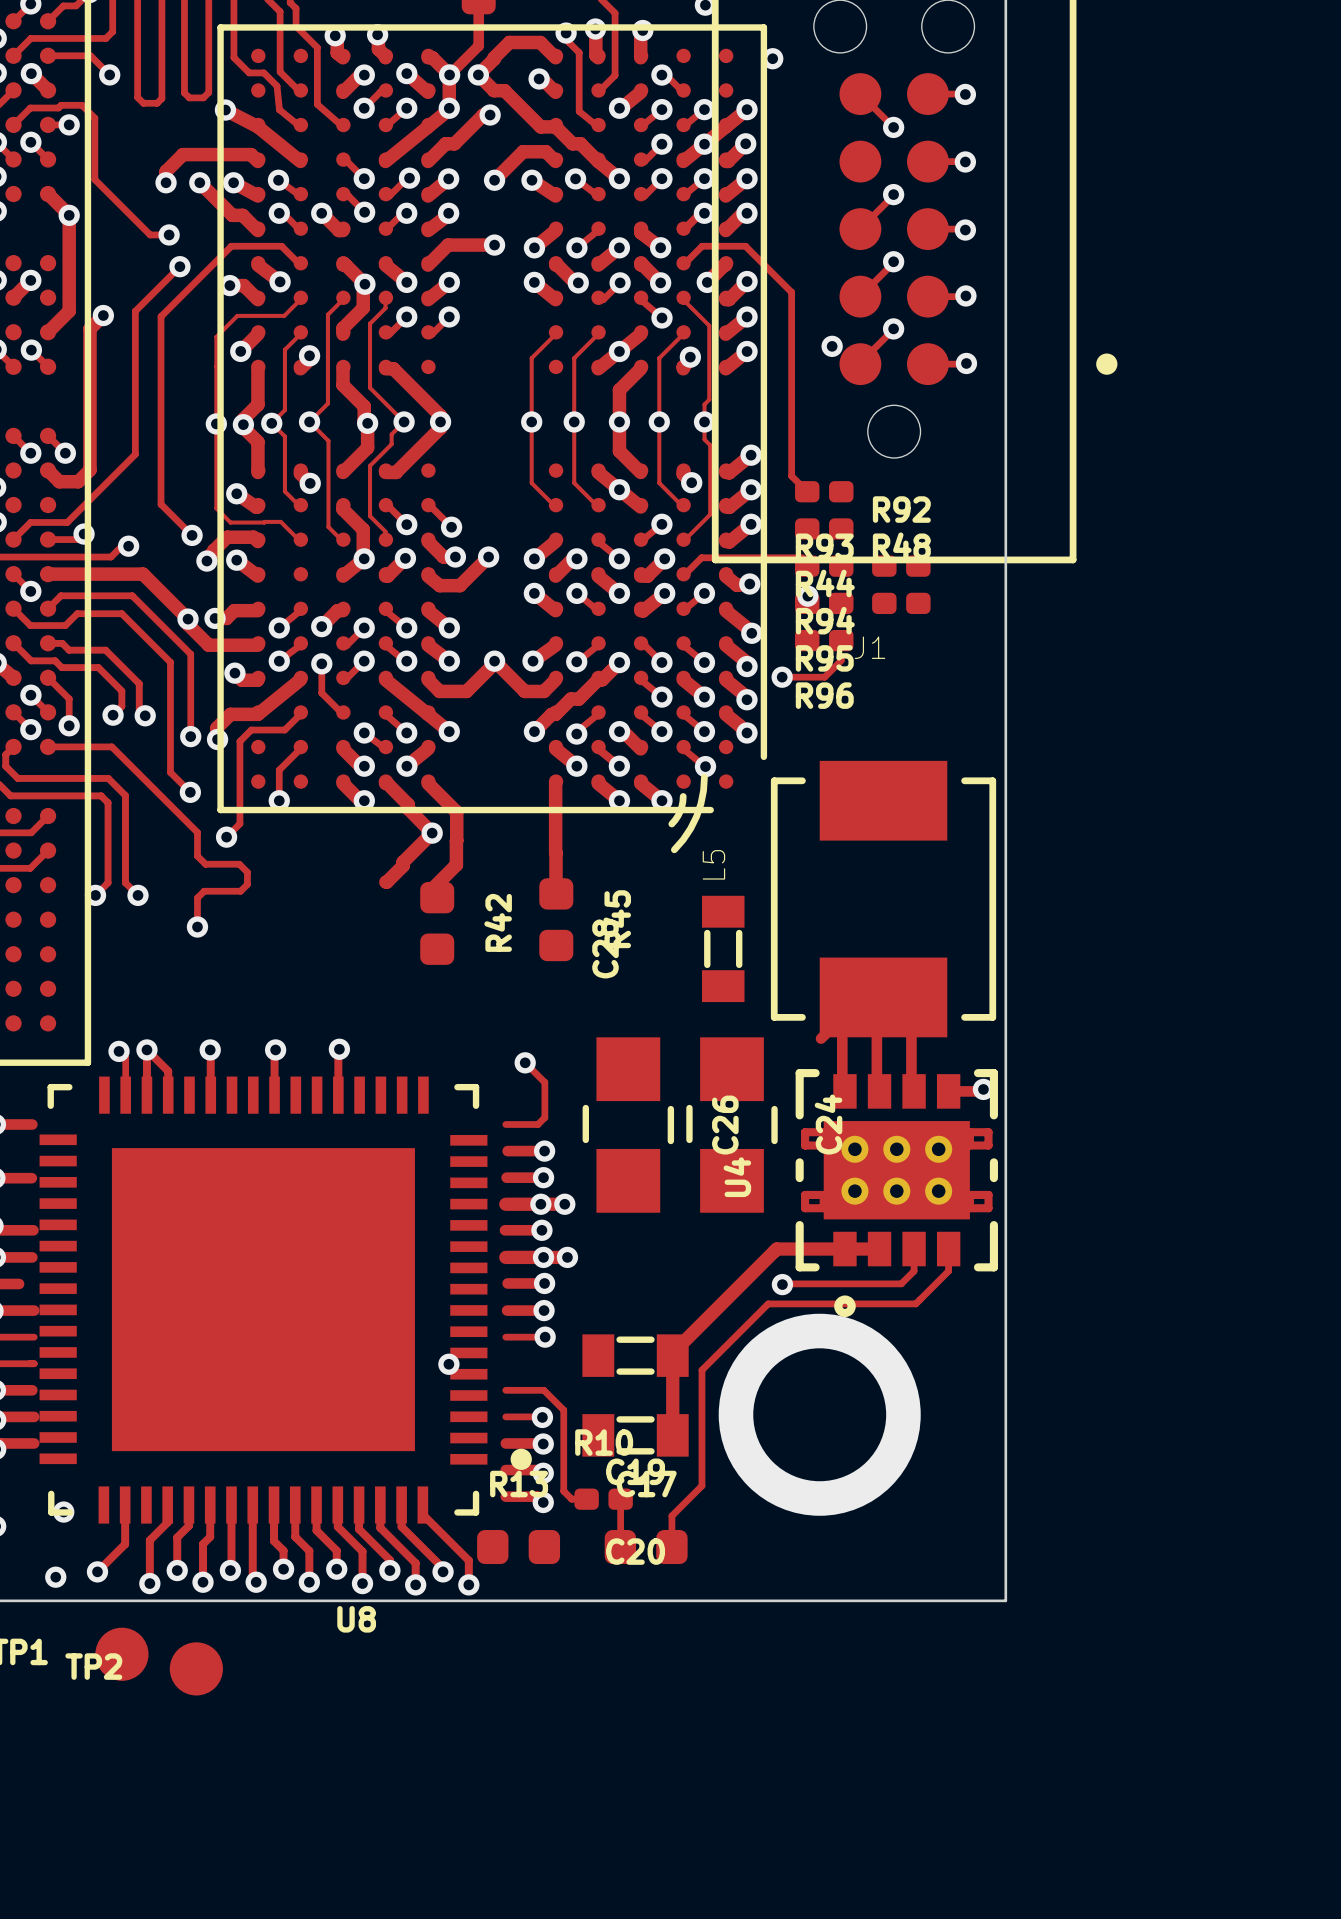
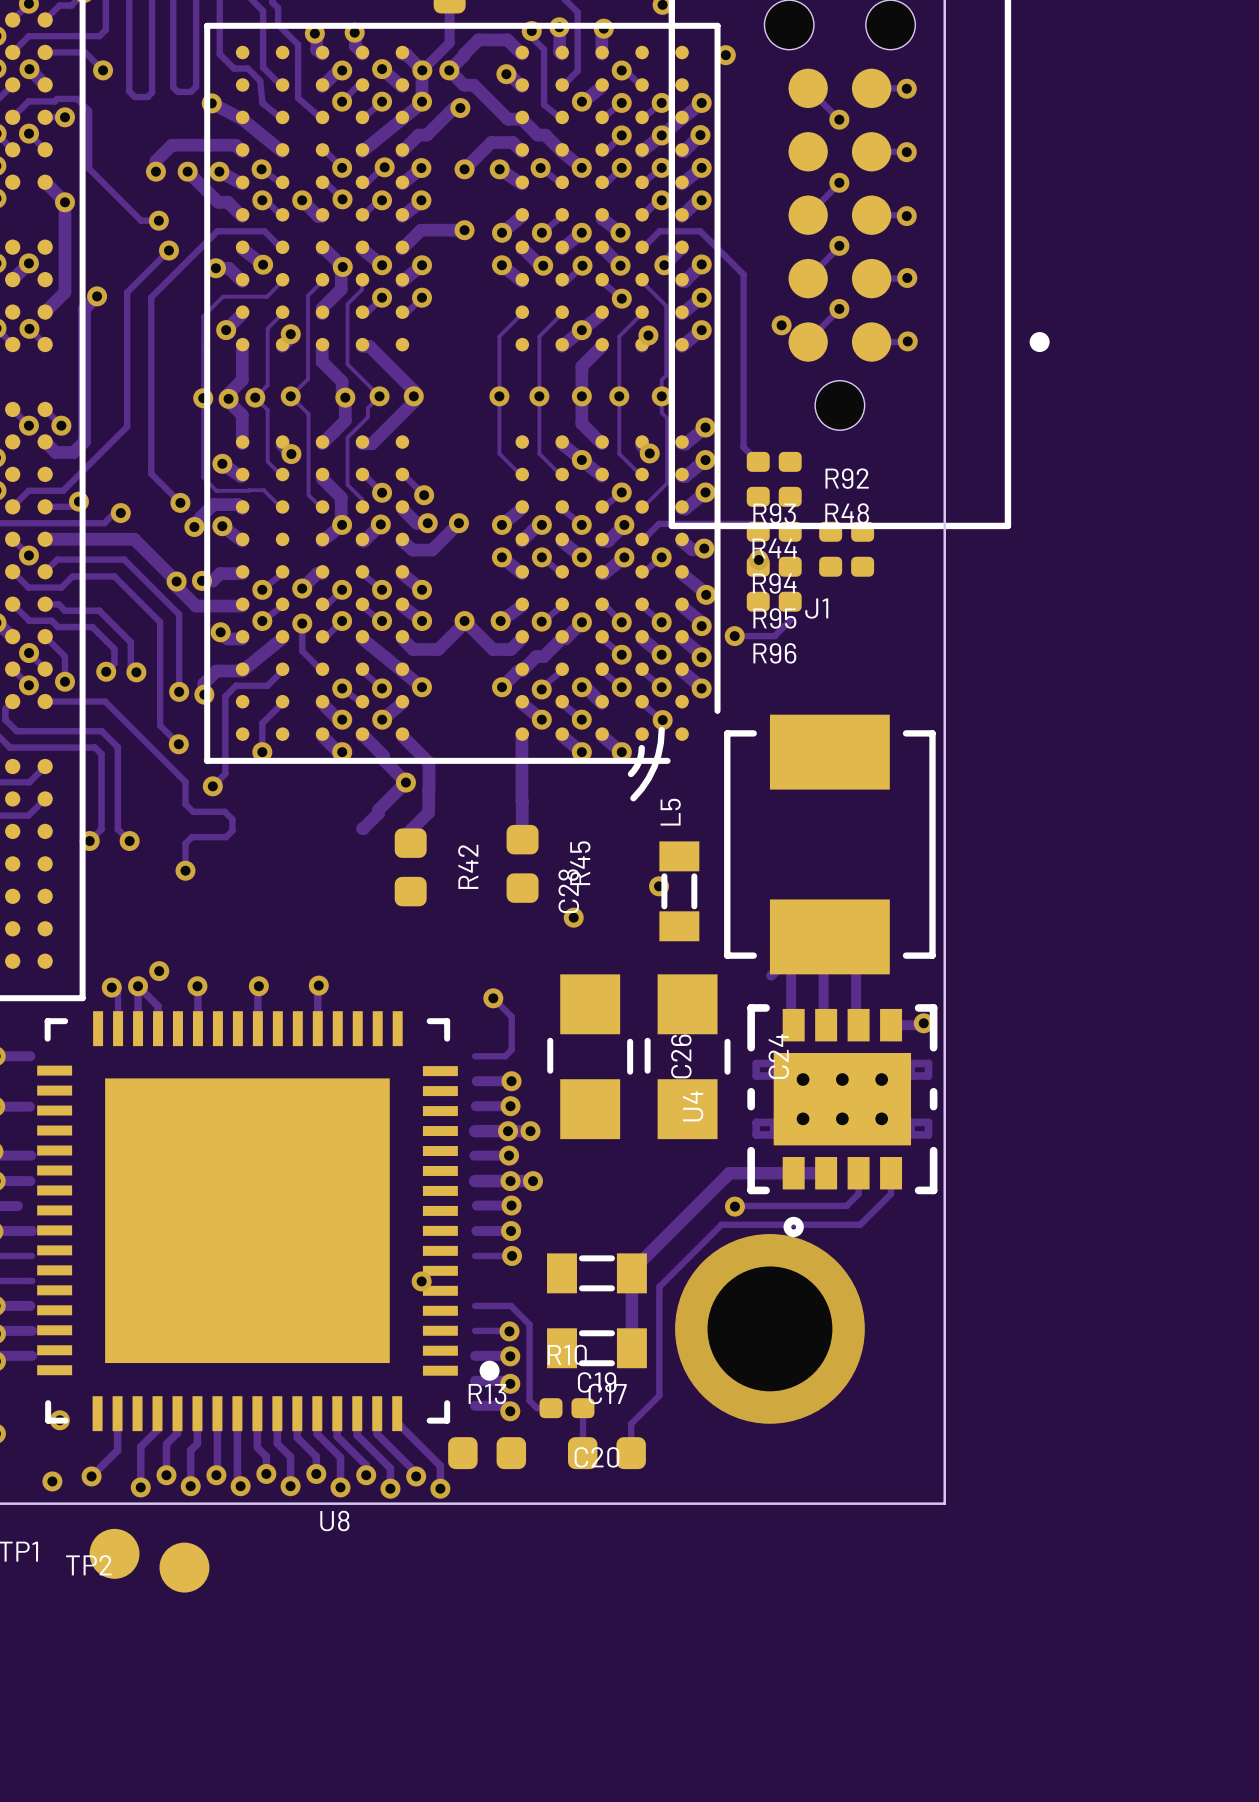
via: none -> (659, 886)
via: none -> (573, 917)
via: none -> (159, 971)

